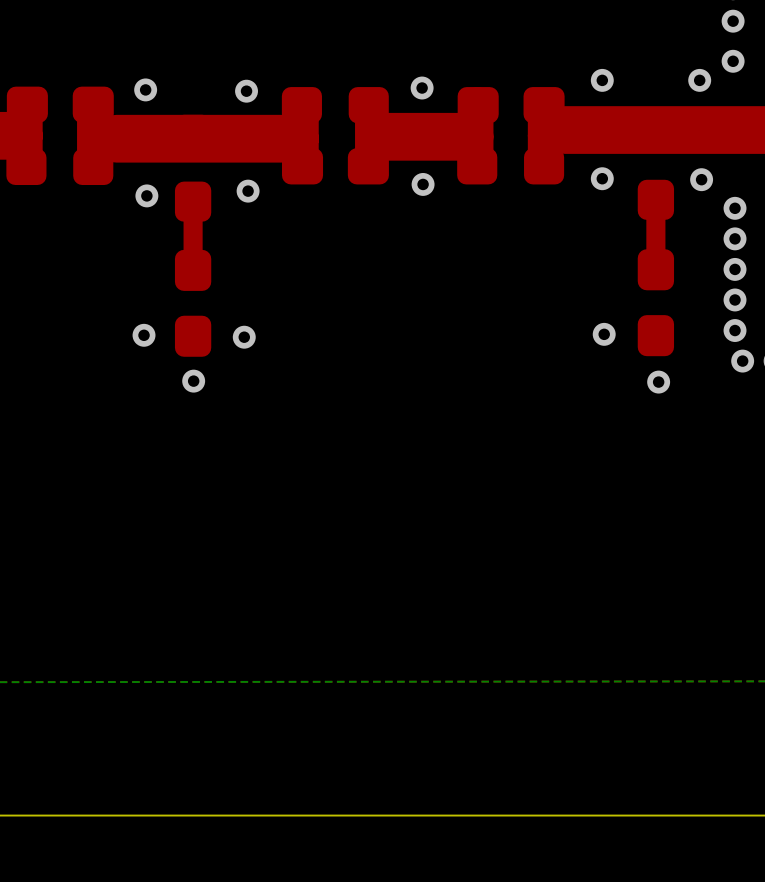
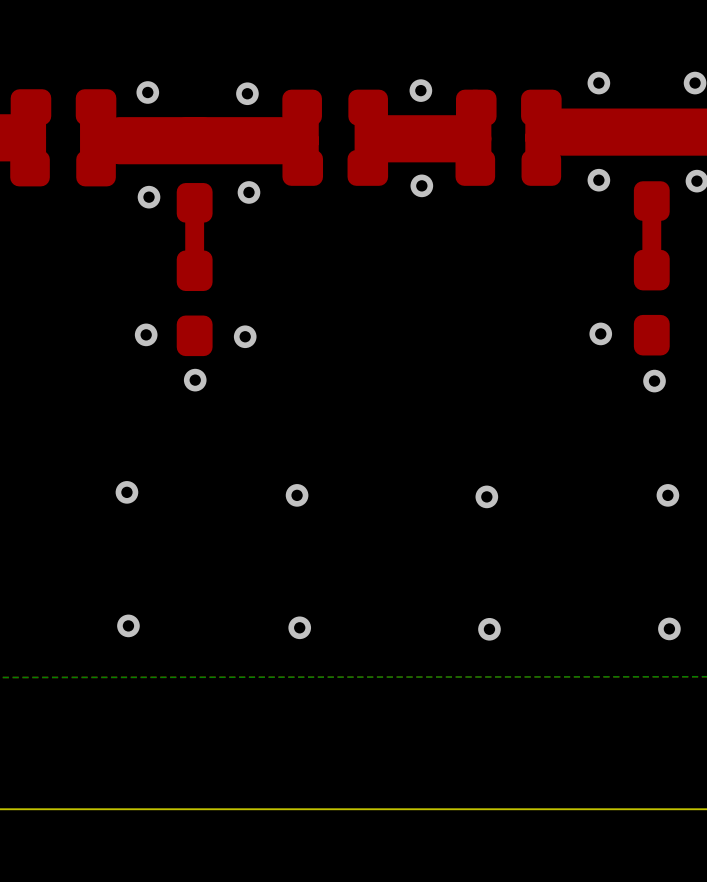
via: none -> (126, 492)
via: none -> (297, 495)
via: none -> (667, 495)
via: none -> (486, 496)
via: none -> (128, 625)
via: none -> (299, 627)
via: none -> (669, 628)
via: none -> (489, 629)

